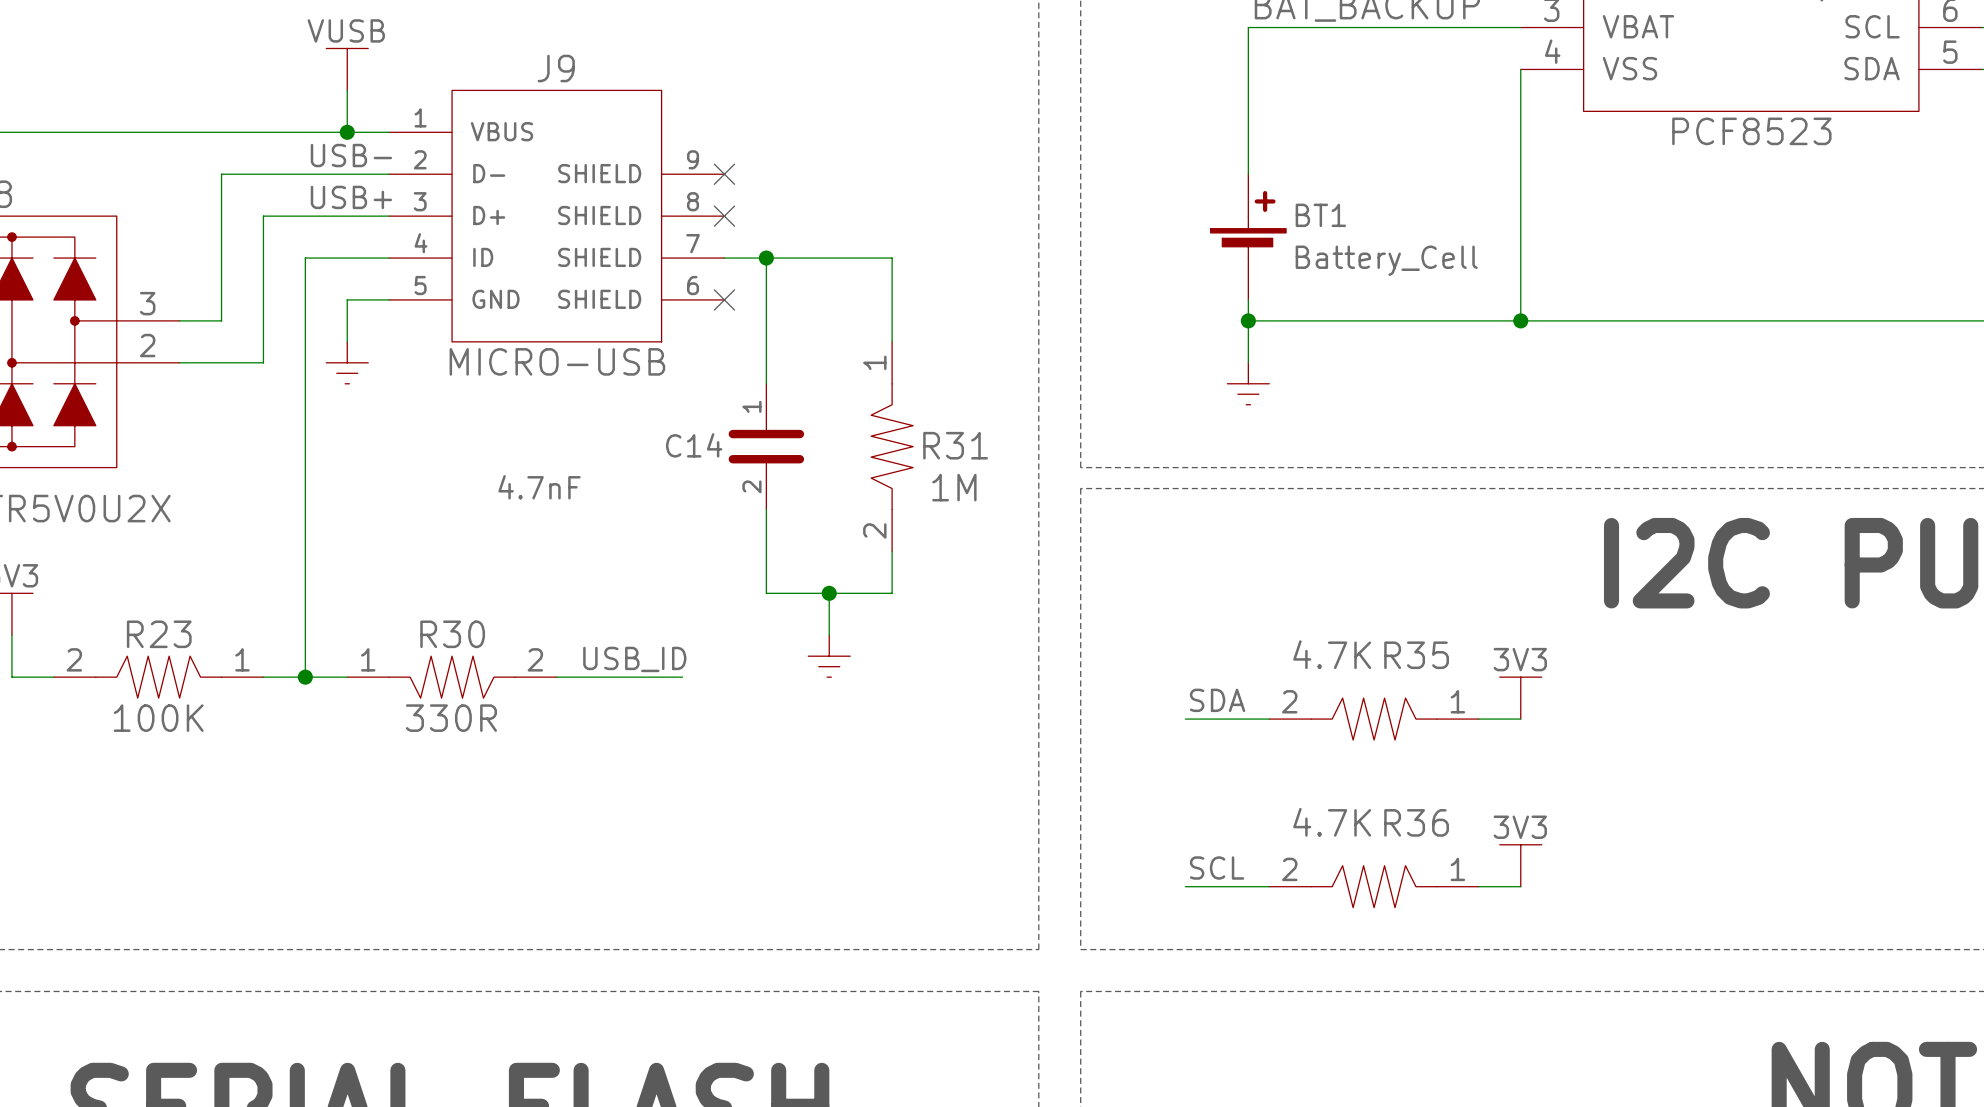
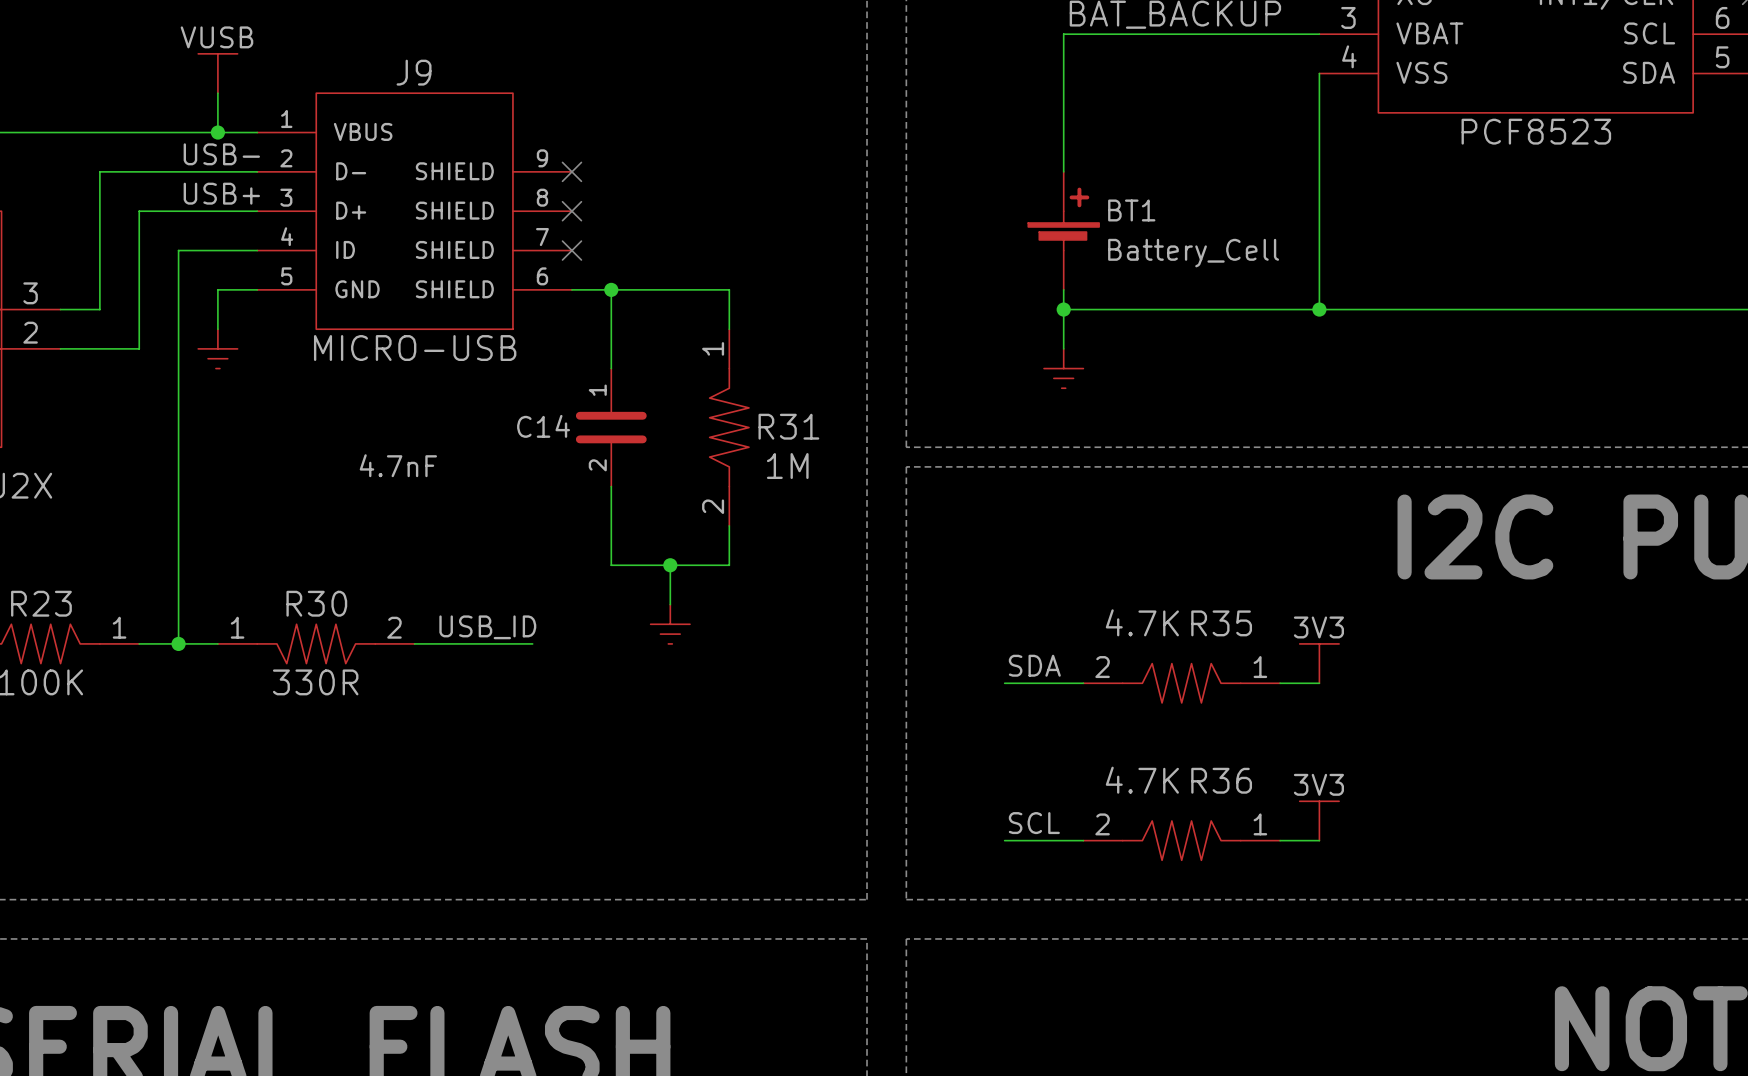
wire: (724, 258) (892, 258) (892, 299) -> (571, 289) (729, 289)
wire: (766, 258) (766, 299) -> none
junction position: (766, 258) -> (611, 289)
no-connect mark position: (724, 299) -> (571, 250)

